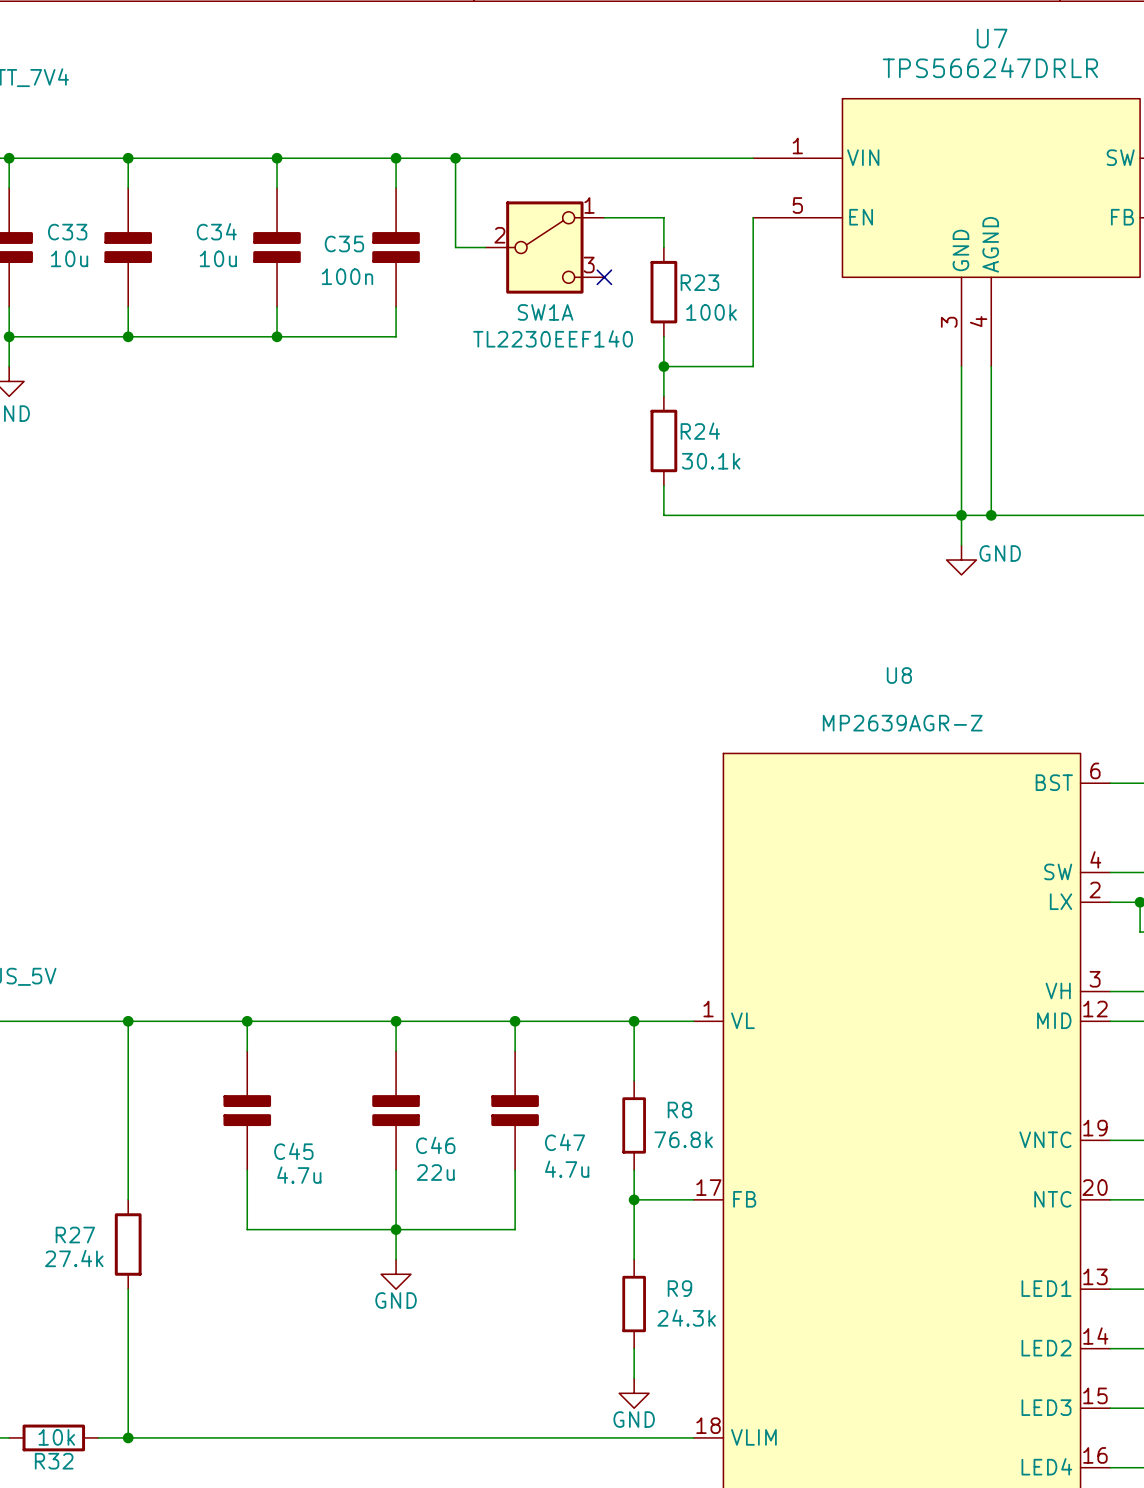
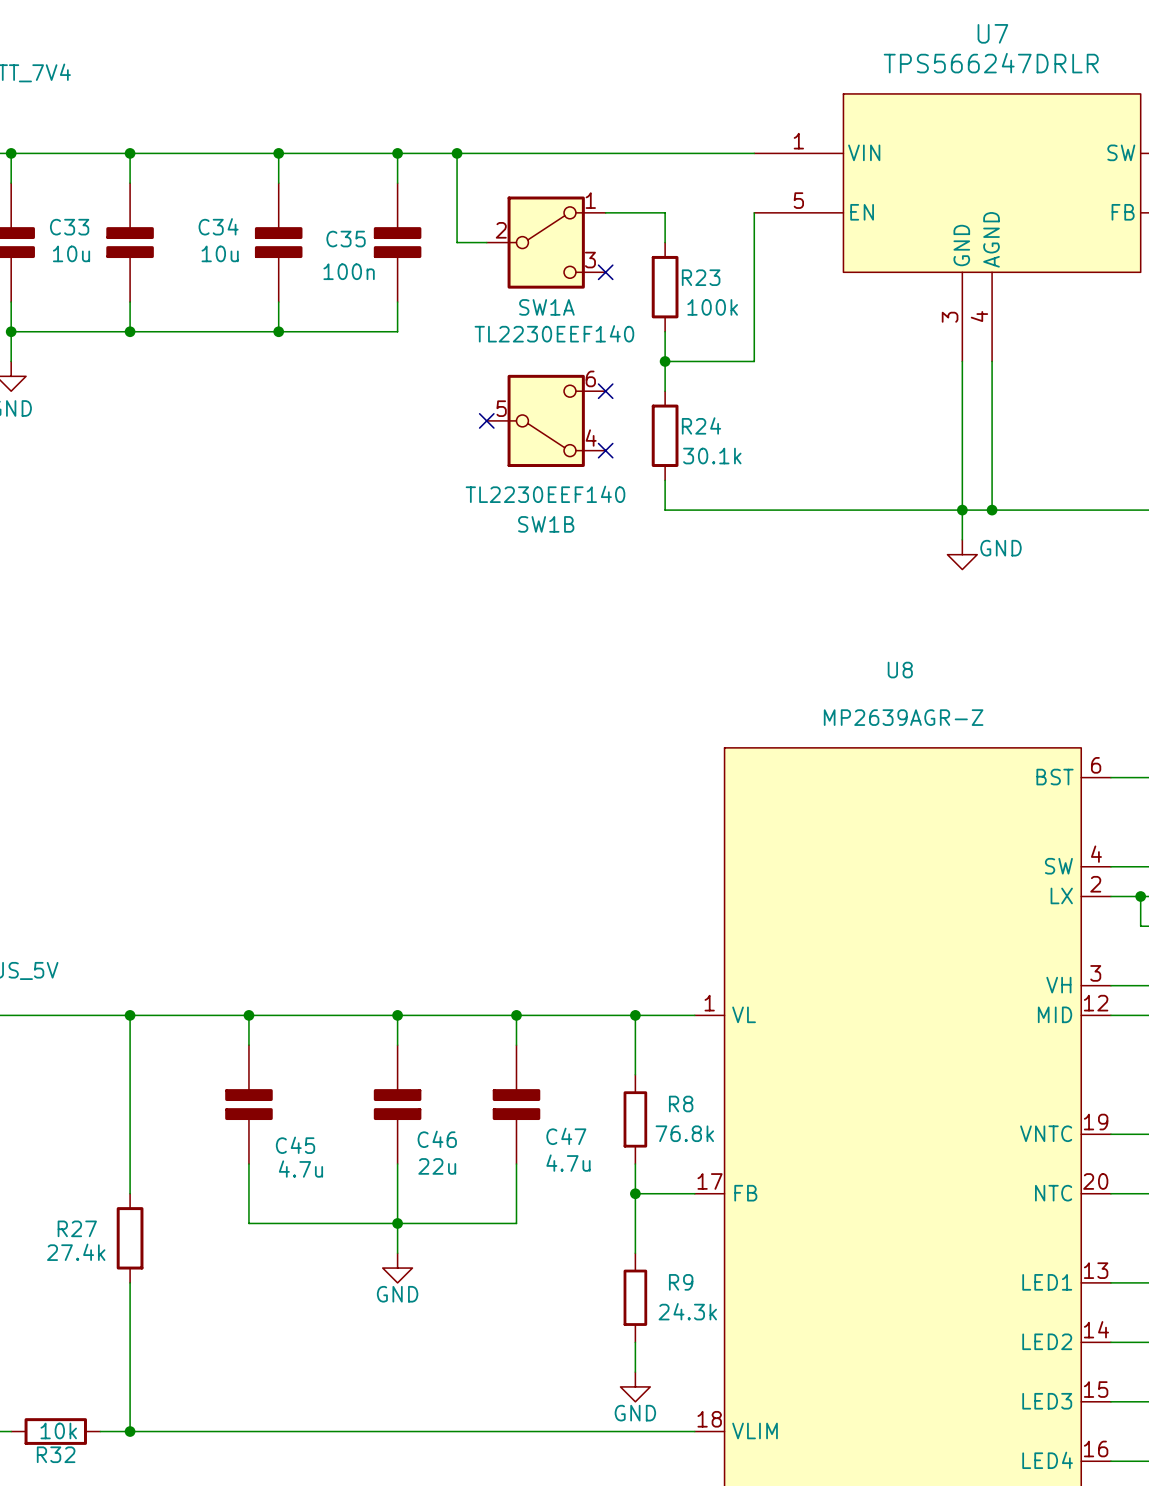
no-connect mark: none -> (605, 391)
no-connect mark: none -> (486, 420)
SW1B: none -> TL2230EEF140 (546, 420)
no-connect mark: none -> (605, 450)

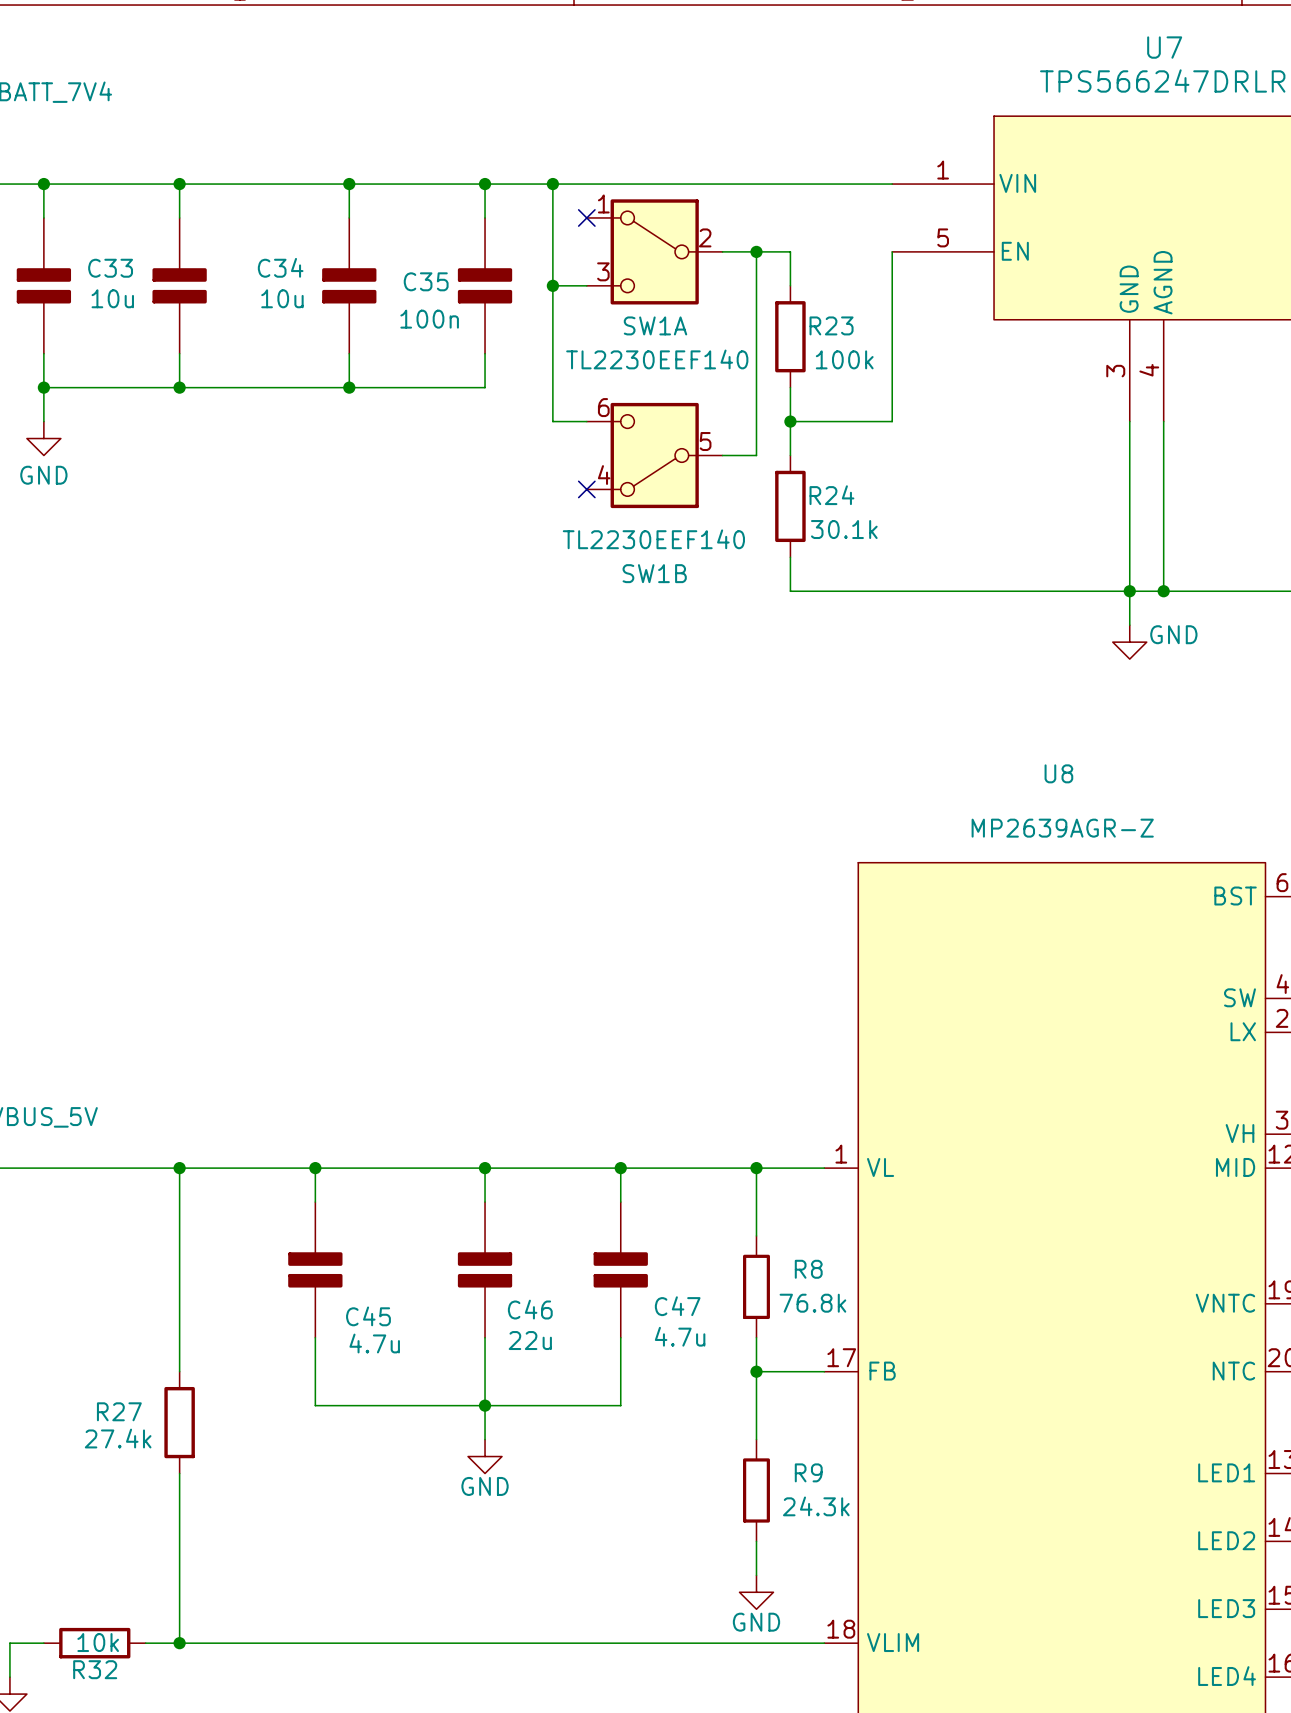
no-connect mark: none -> (586, 217)
wire: none -> (756, 251) (756, 455) (722, 455)
junction: none -> (756, 251)
wire: none -> (552, 285) (552, 421) (586, 421)
junction: none -> (552, 285)
SW1A flip: as is (546, 242) -> left-right (654, 251)
no-connect mark: (605, 272) -> none
no-connect mark: (605, 391) -> none
SW1B flip: as is (546, 420) -> left-right (654, 455)
no-connect mark: (605, 450) -> none

